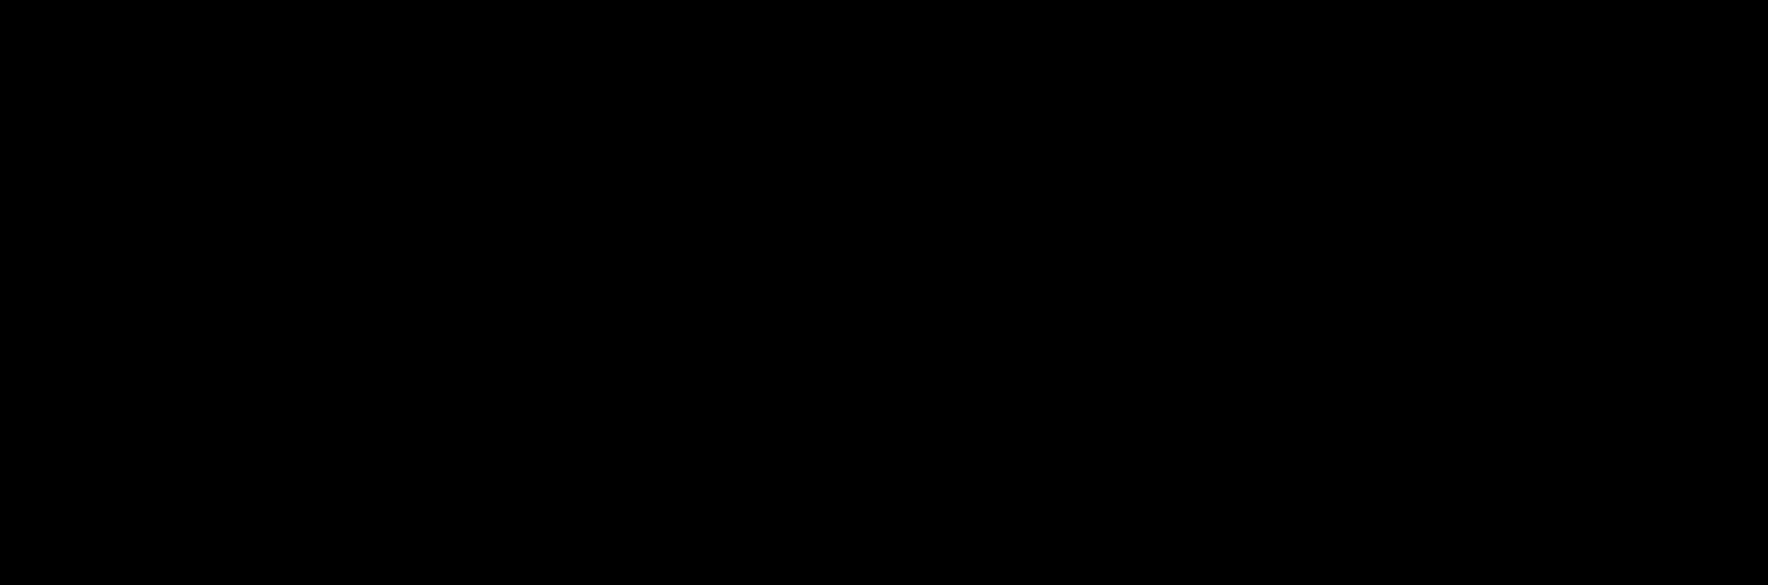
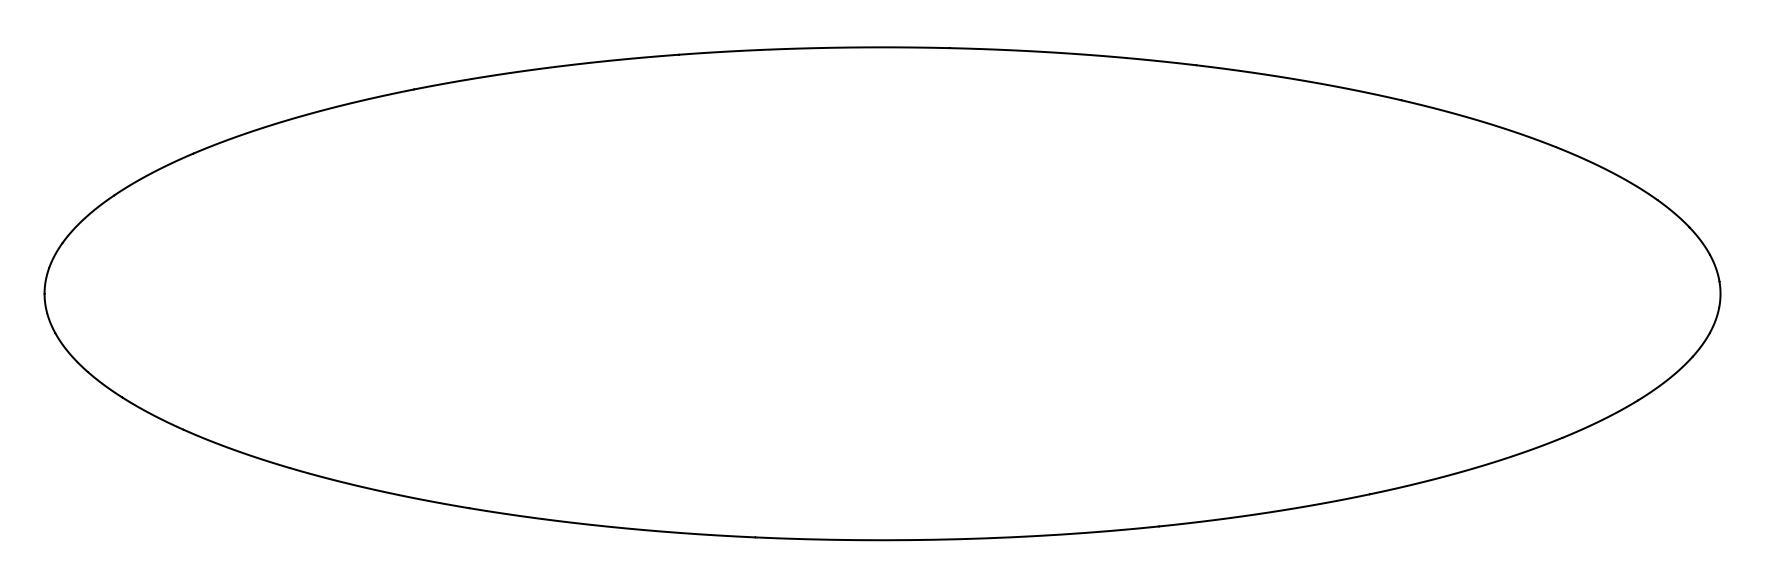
board edge: none -> (949, 48) (1121, 57) (1277, 76) (1412, 102) (1474, 119) (1530, 137) (1578, 156) (1618, 176) (1657, 200) (1684, 222) (1704, 246) (1716, 269) (1720, 294) (1716, 318) (1705, 340) (1687, 362) (1661, 384) (1629, 405) (1593, 424) (1552, 441) (1449, 475) (1320, 504) (1187, 523) (1035, 536) (882, 540) (736, 536) (590, 524) (445, 504) (320, 476) (267, 461) (213, 442) (170, 423) (132, 403) (99, 381) (75, 360) (58, 337) (47, 315) (44, 288) (51, 261) (67, 236) (94, 210) (131, 184) (176, 161) (228, 139) (293, 118) (351, 103) (429, 86) (508, 73) (592, 62) (762, 49) (864, 47) (949, 48)

